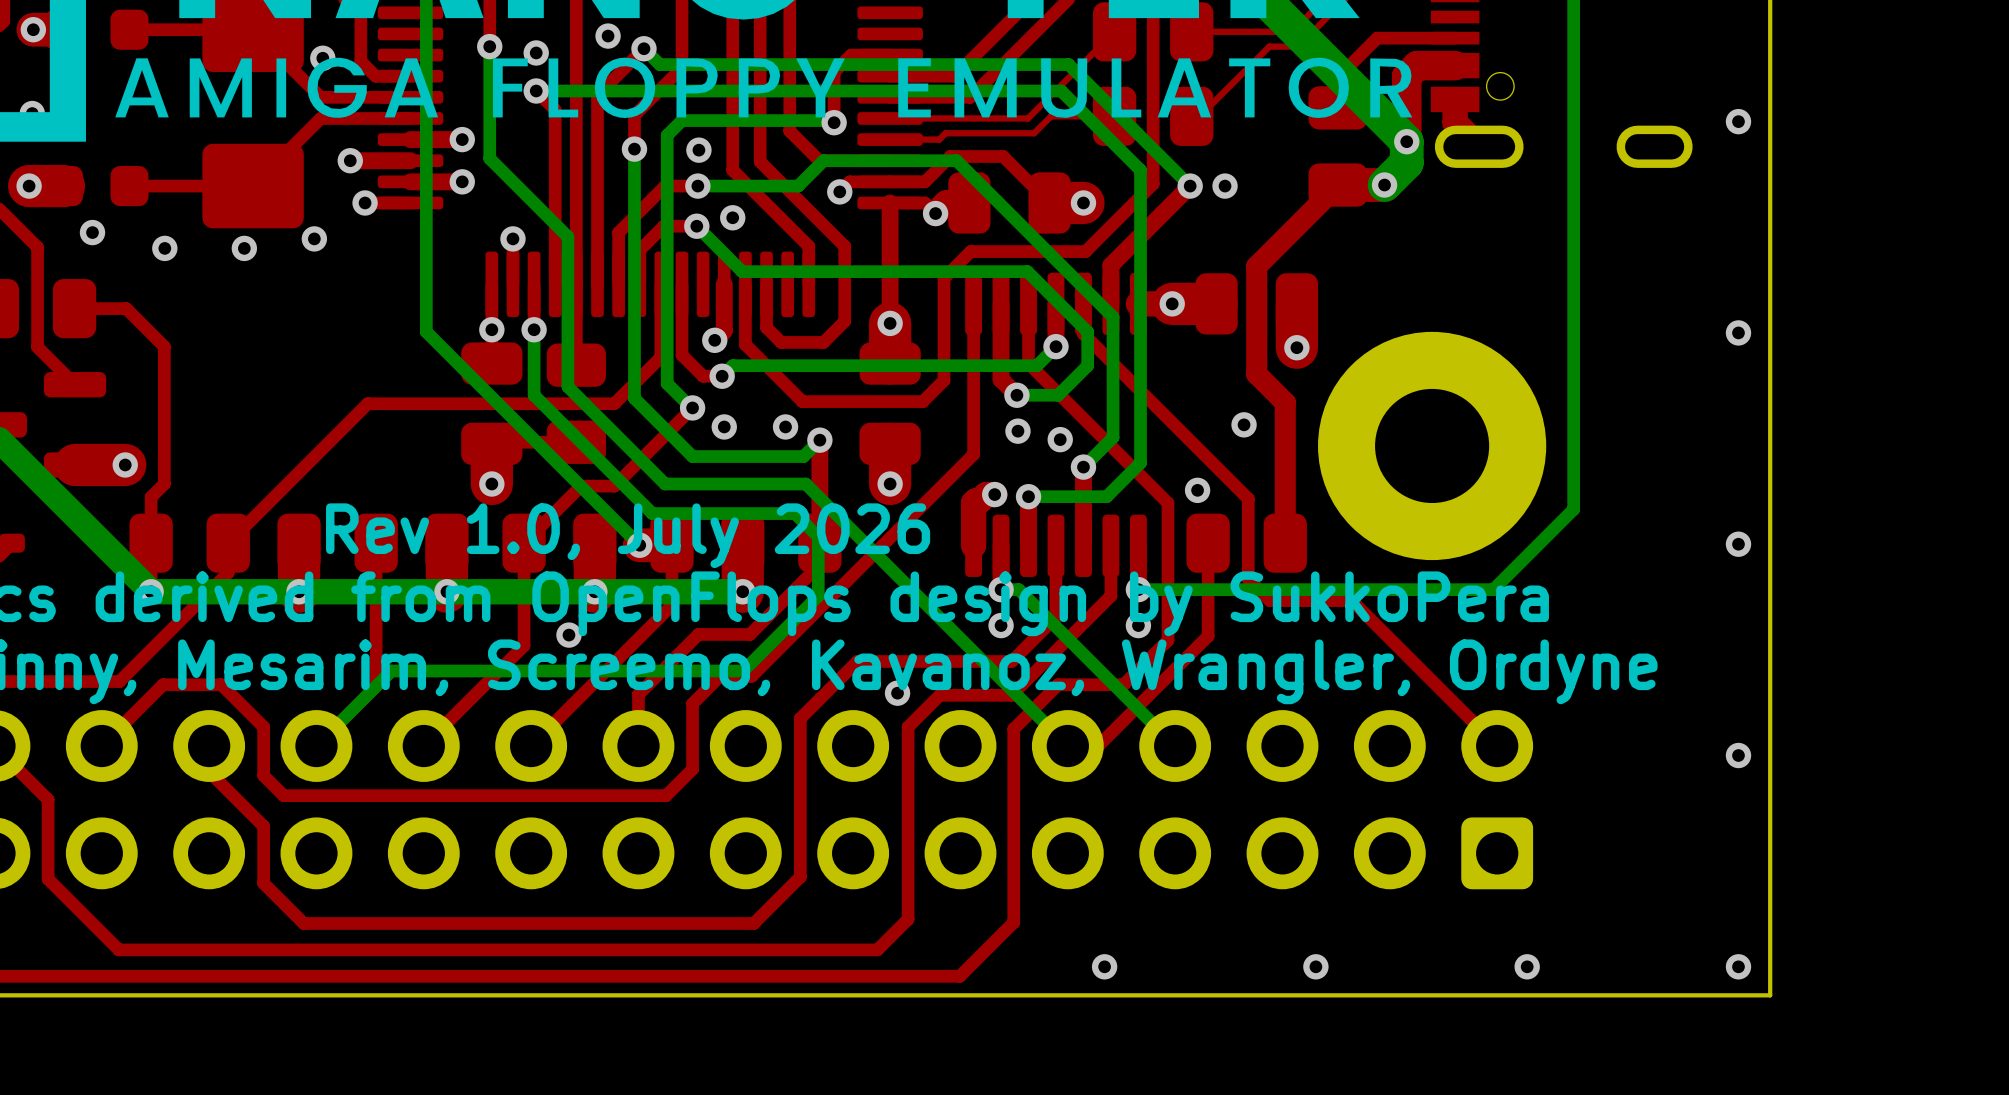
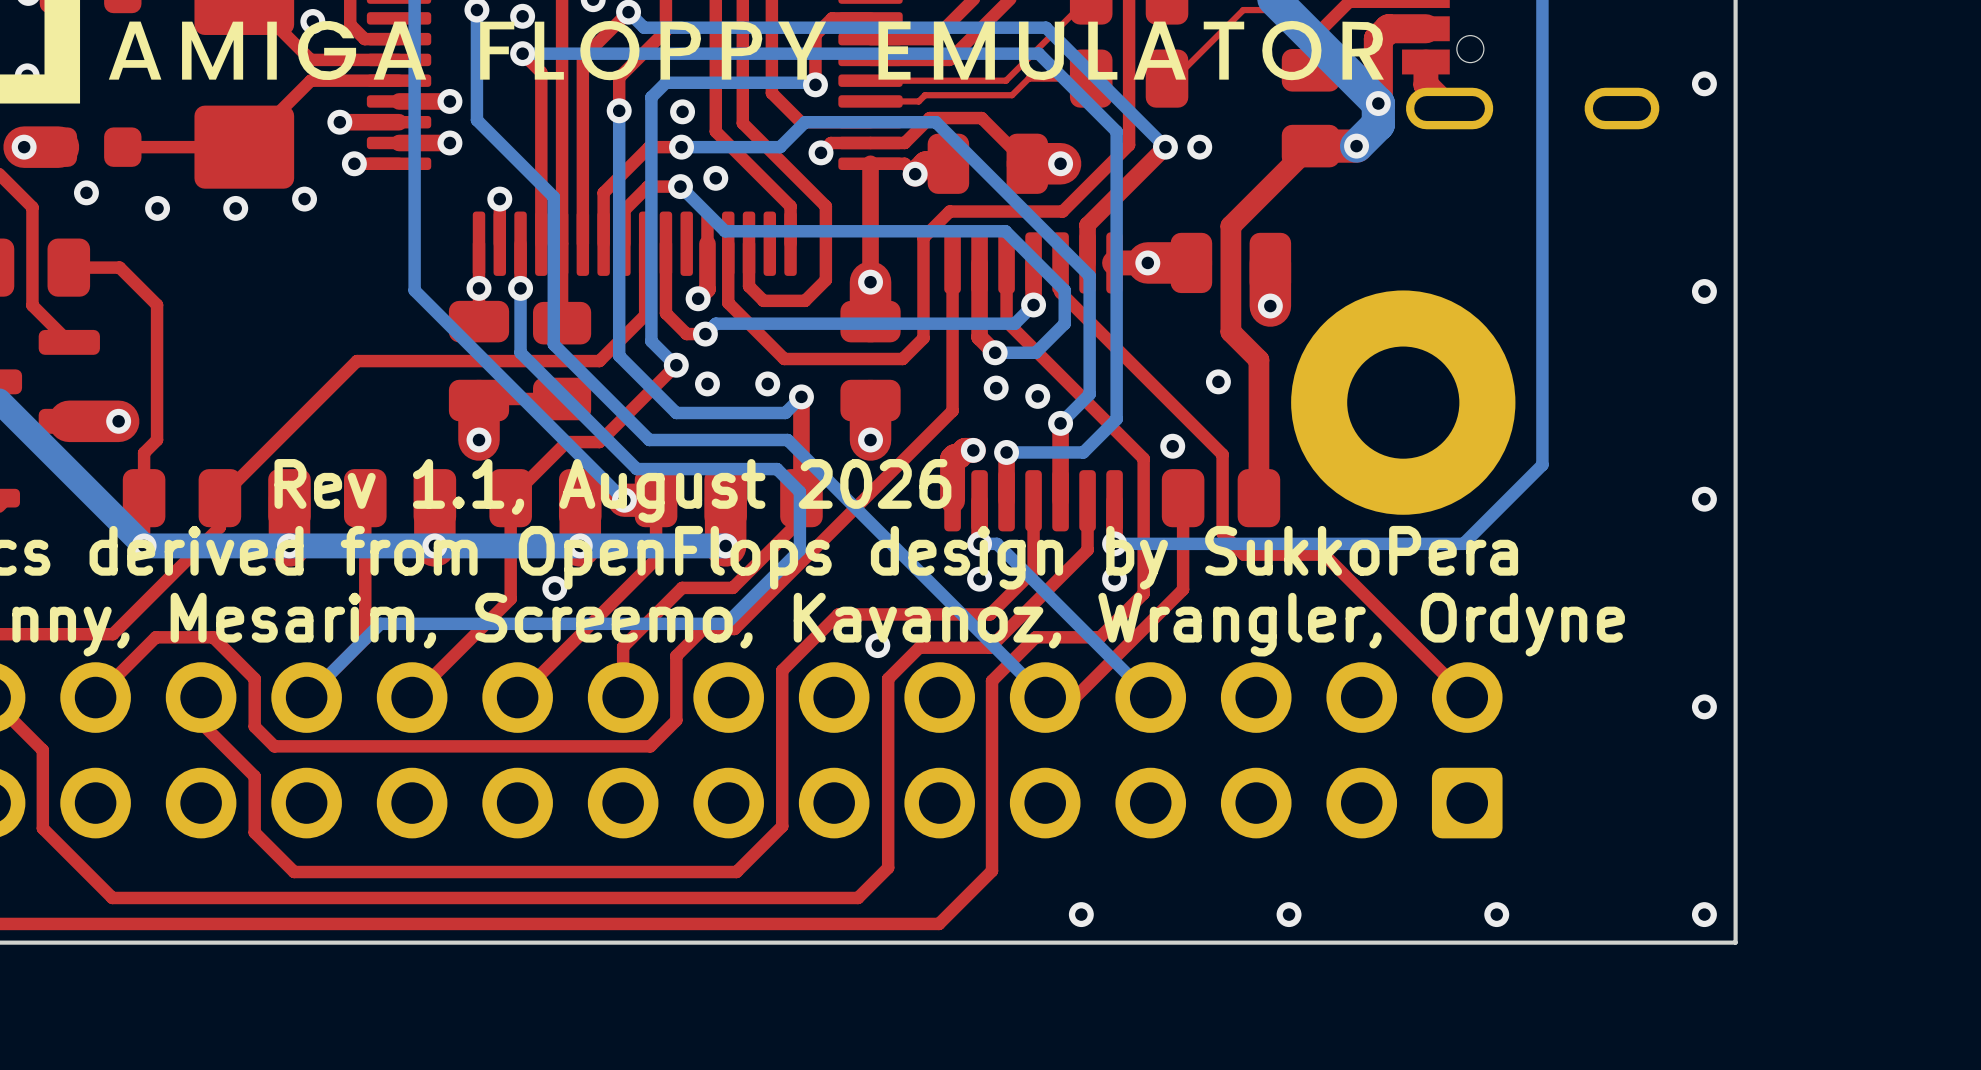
text: Rev 1.0, July 2026 (628, 535) -> Rev 1.1, August 2026 (612, 490)

